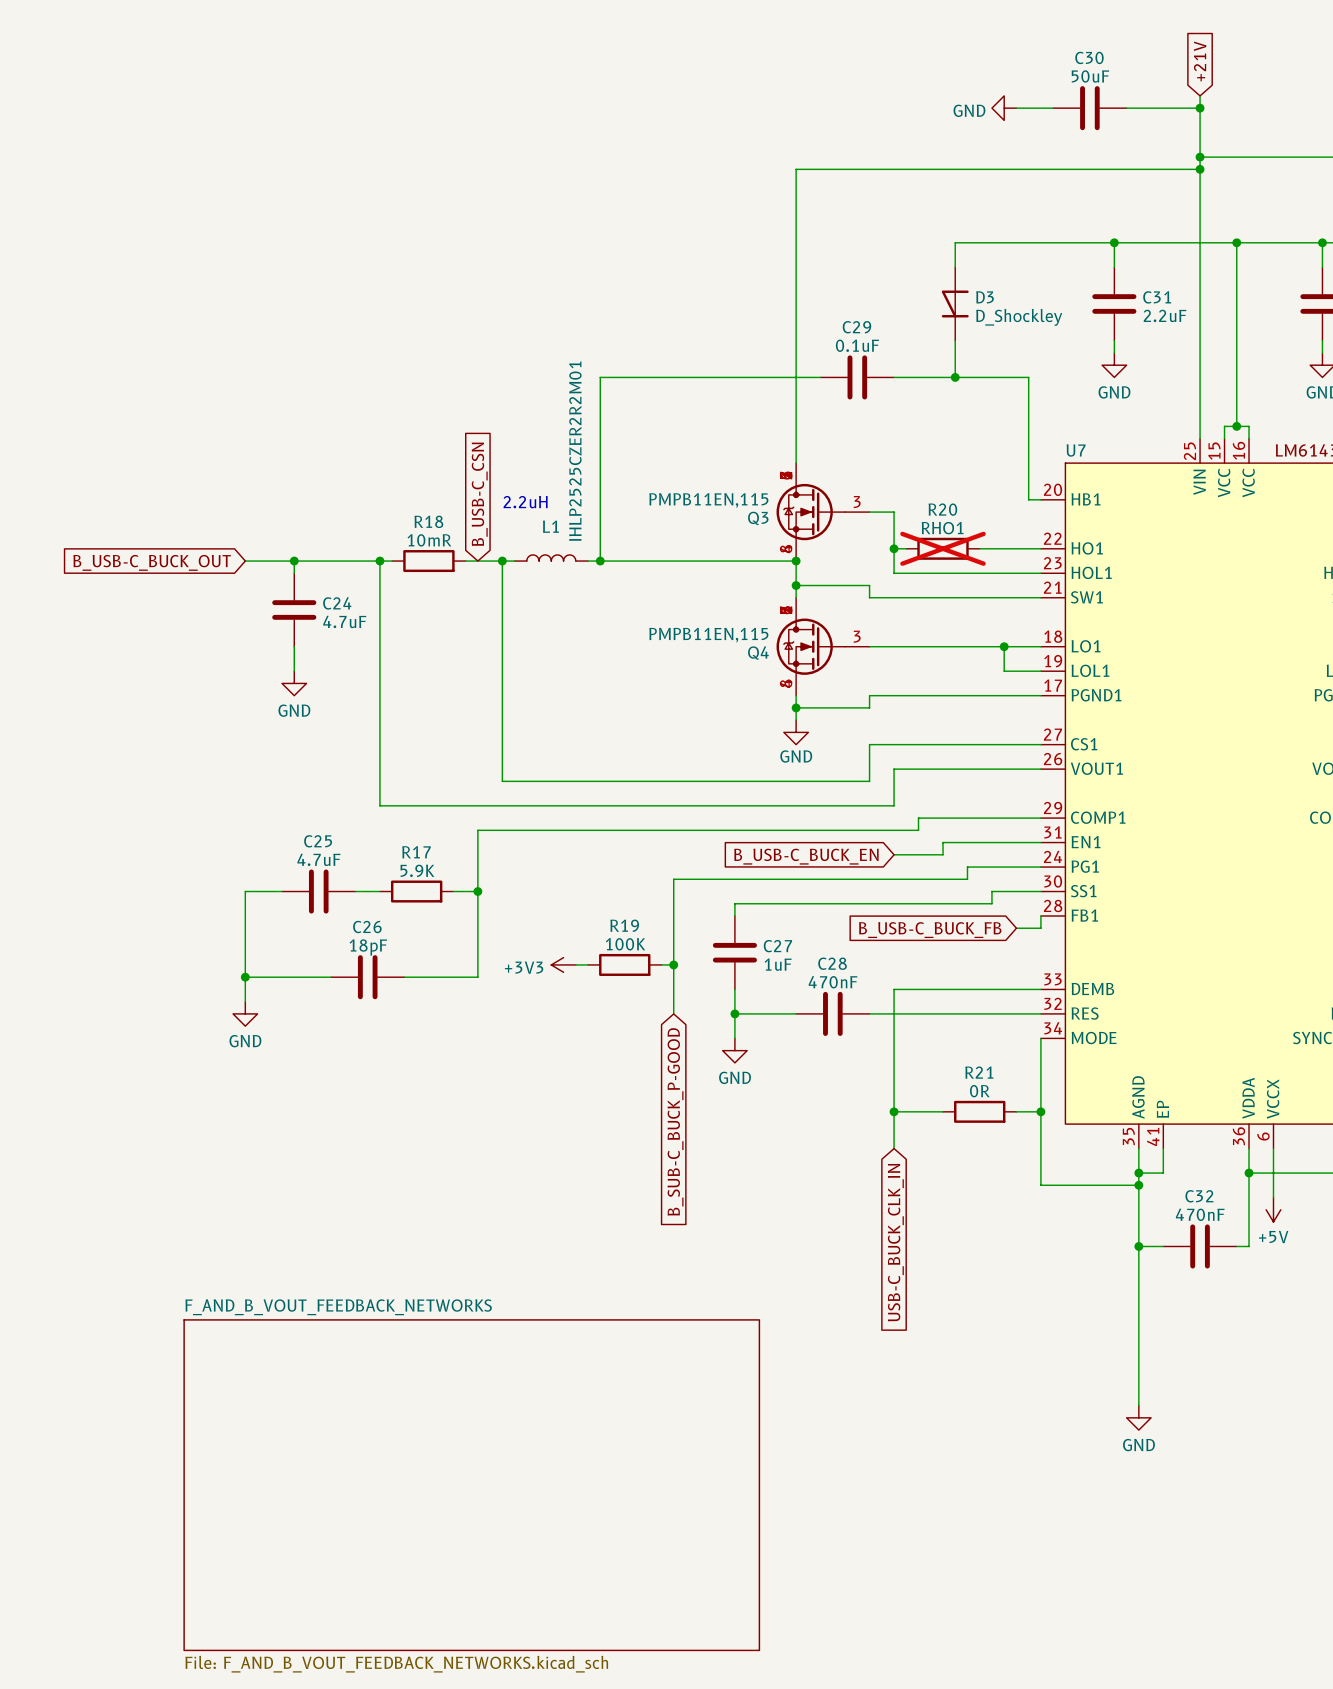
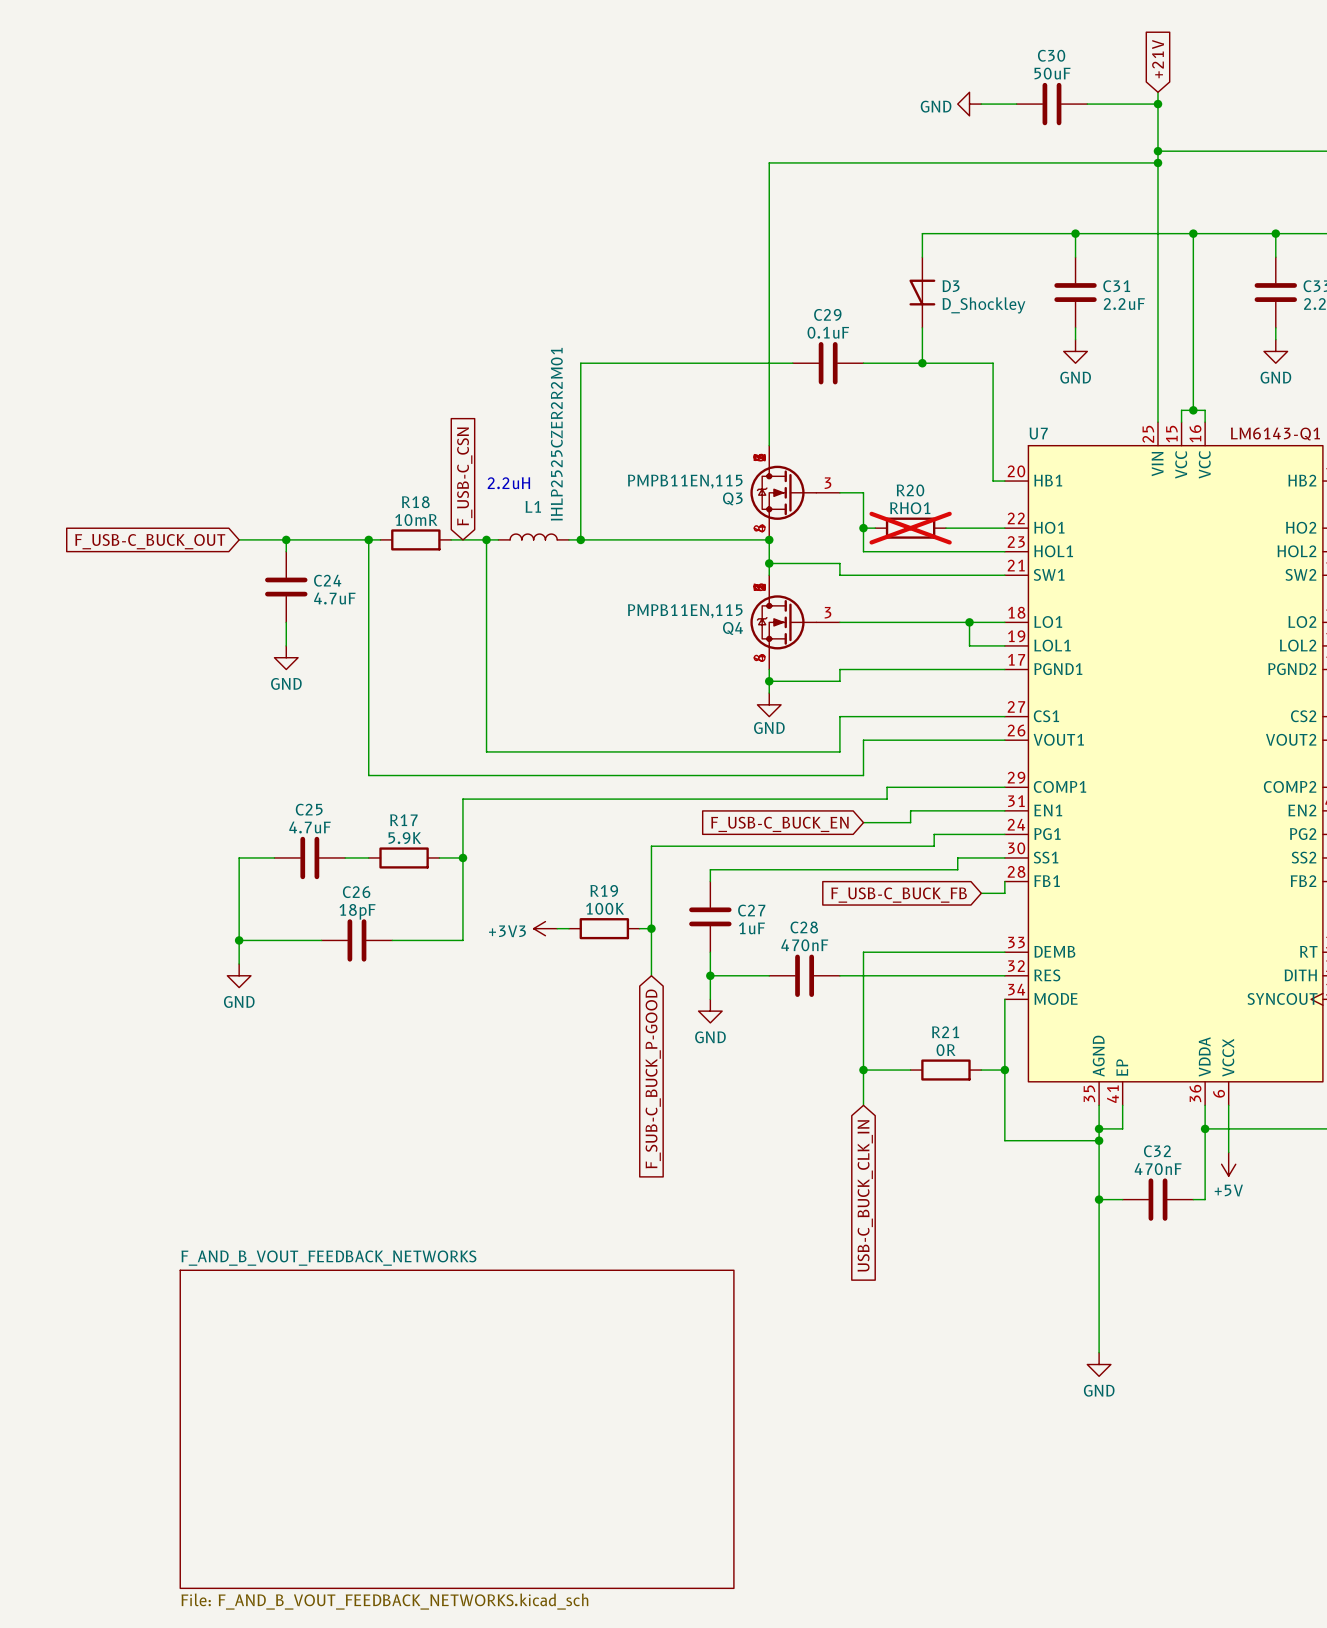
global label: B_USB-C_CSN (479, 494) -> F_USB-C_CSN (464, 476)
global label: B_USB-C_BUCK_OUT (152, 562) -> F_USB-C_BUCK_OUT (150, 541)
global label: B_USB-C_BUCK_EN (806, 856) -> F_USB-C_BUCK_EN (779, 824)
global label: B_USB-C_BUCK_FB (930, 930) -> F_USB-C_BUCK_FB (899, 895)
global label: B_SUB-C_BUCK_P-GOOD (675, 1121) -> F_SUB-C_BUCK_P-GOOD (653, 1078)

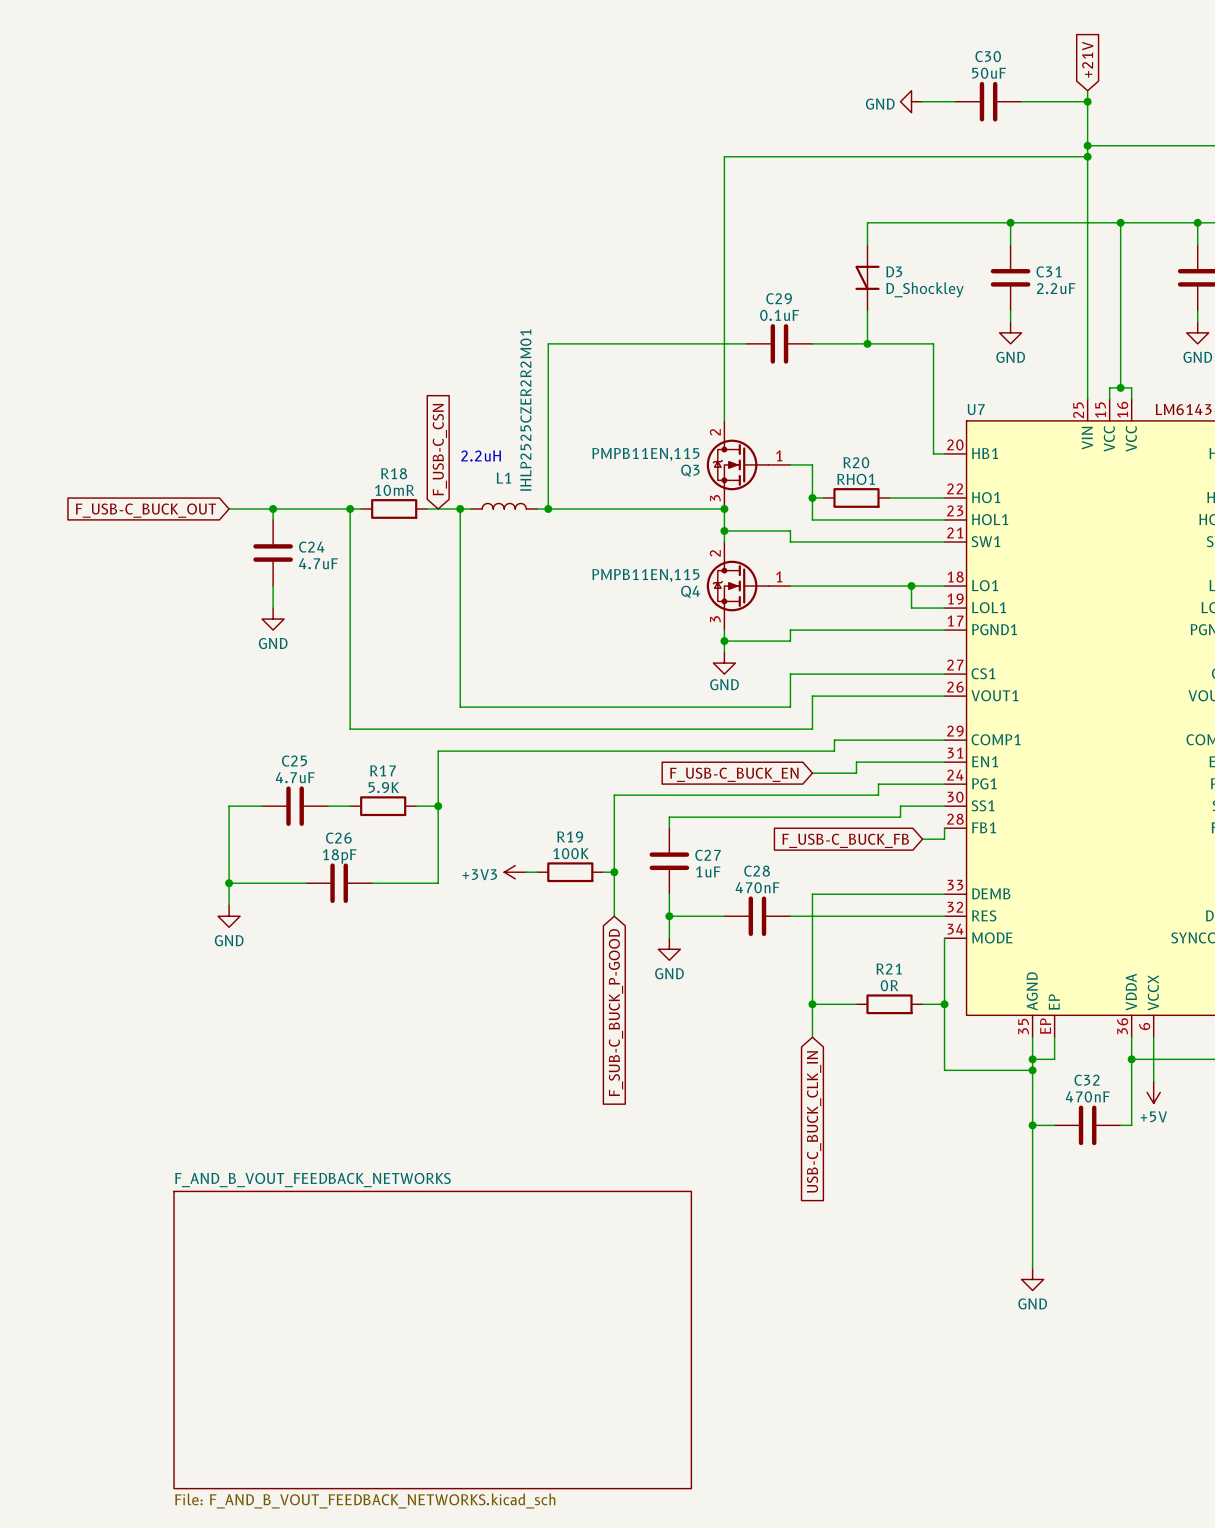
Q3 symbol: [750, 445, 840, 540] -> [706, 420, 791, 509]
R20 do-not-place cross: (910, 528) -> none
Q4 symbol: [750, 575, 840, 670] -> [706, 542, 791, 631]
U7 pin number: 41 (1112, 1094) -> EP (1045, 1026)

